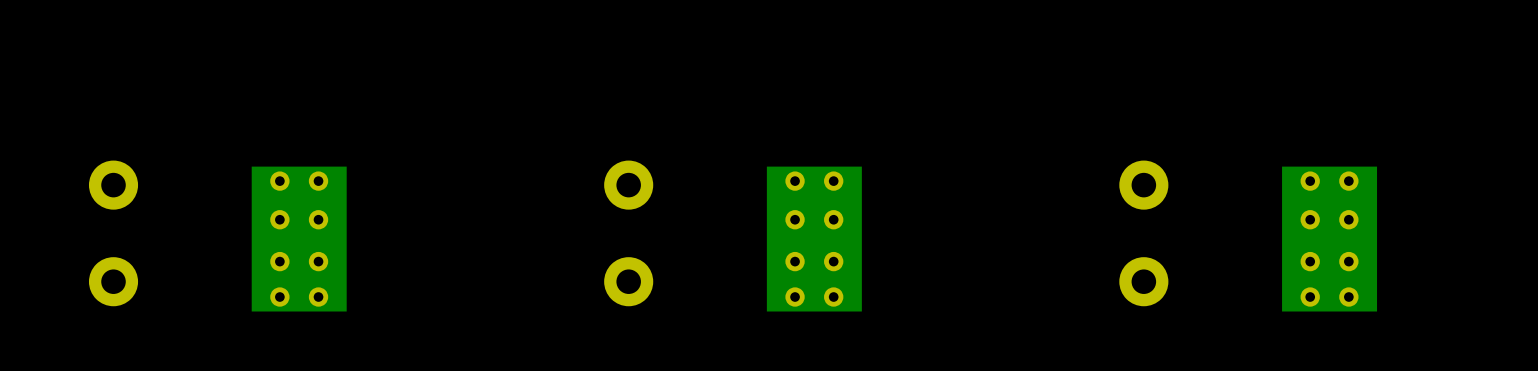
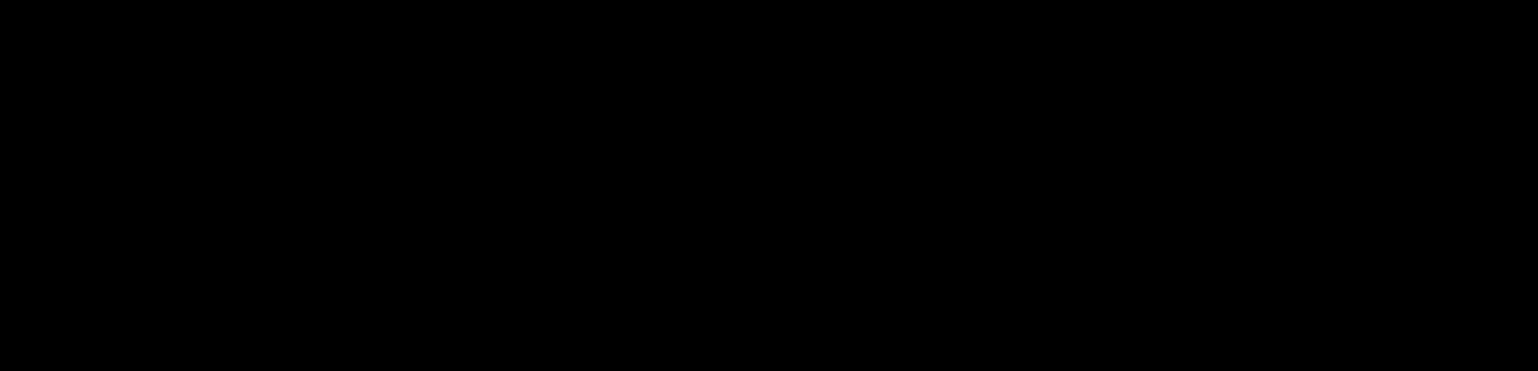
part: (113, 233) -> none
part: (628, 233) -> none
part: (1143, 233) -> none
part: (299, 239) -> none
part: (814, 239) -> none
part: (1329, 239) -> none

